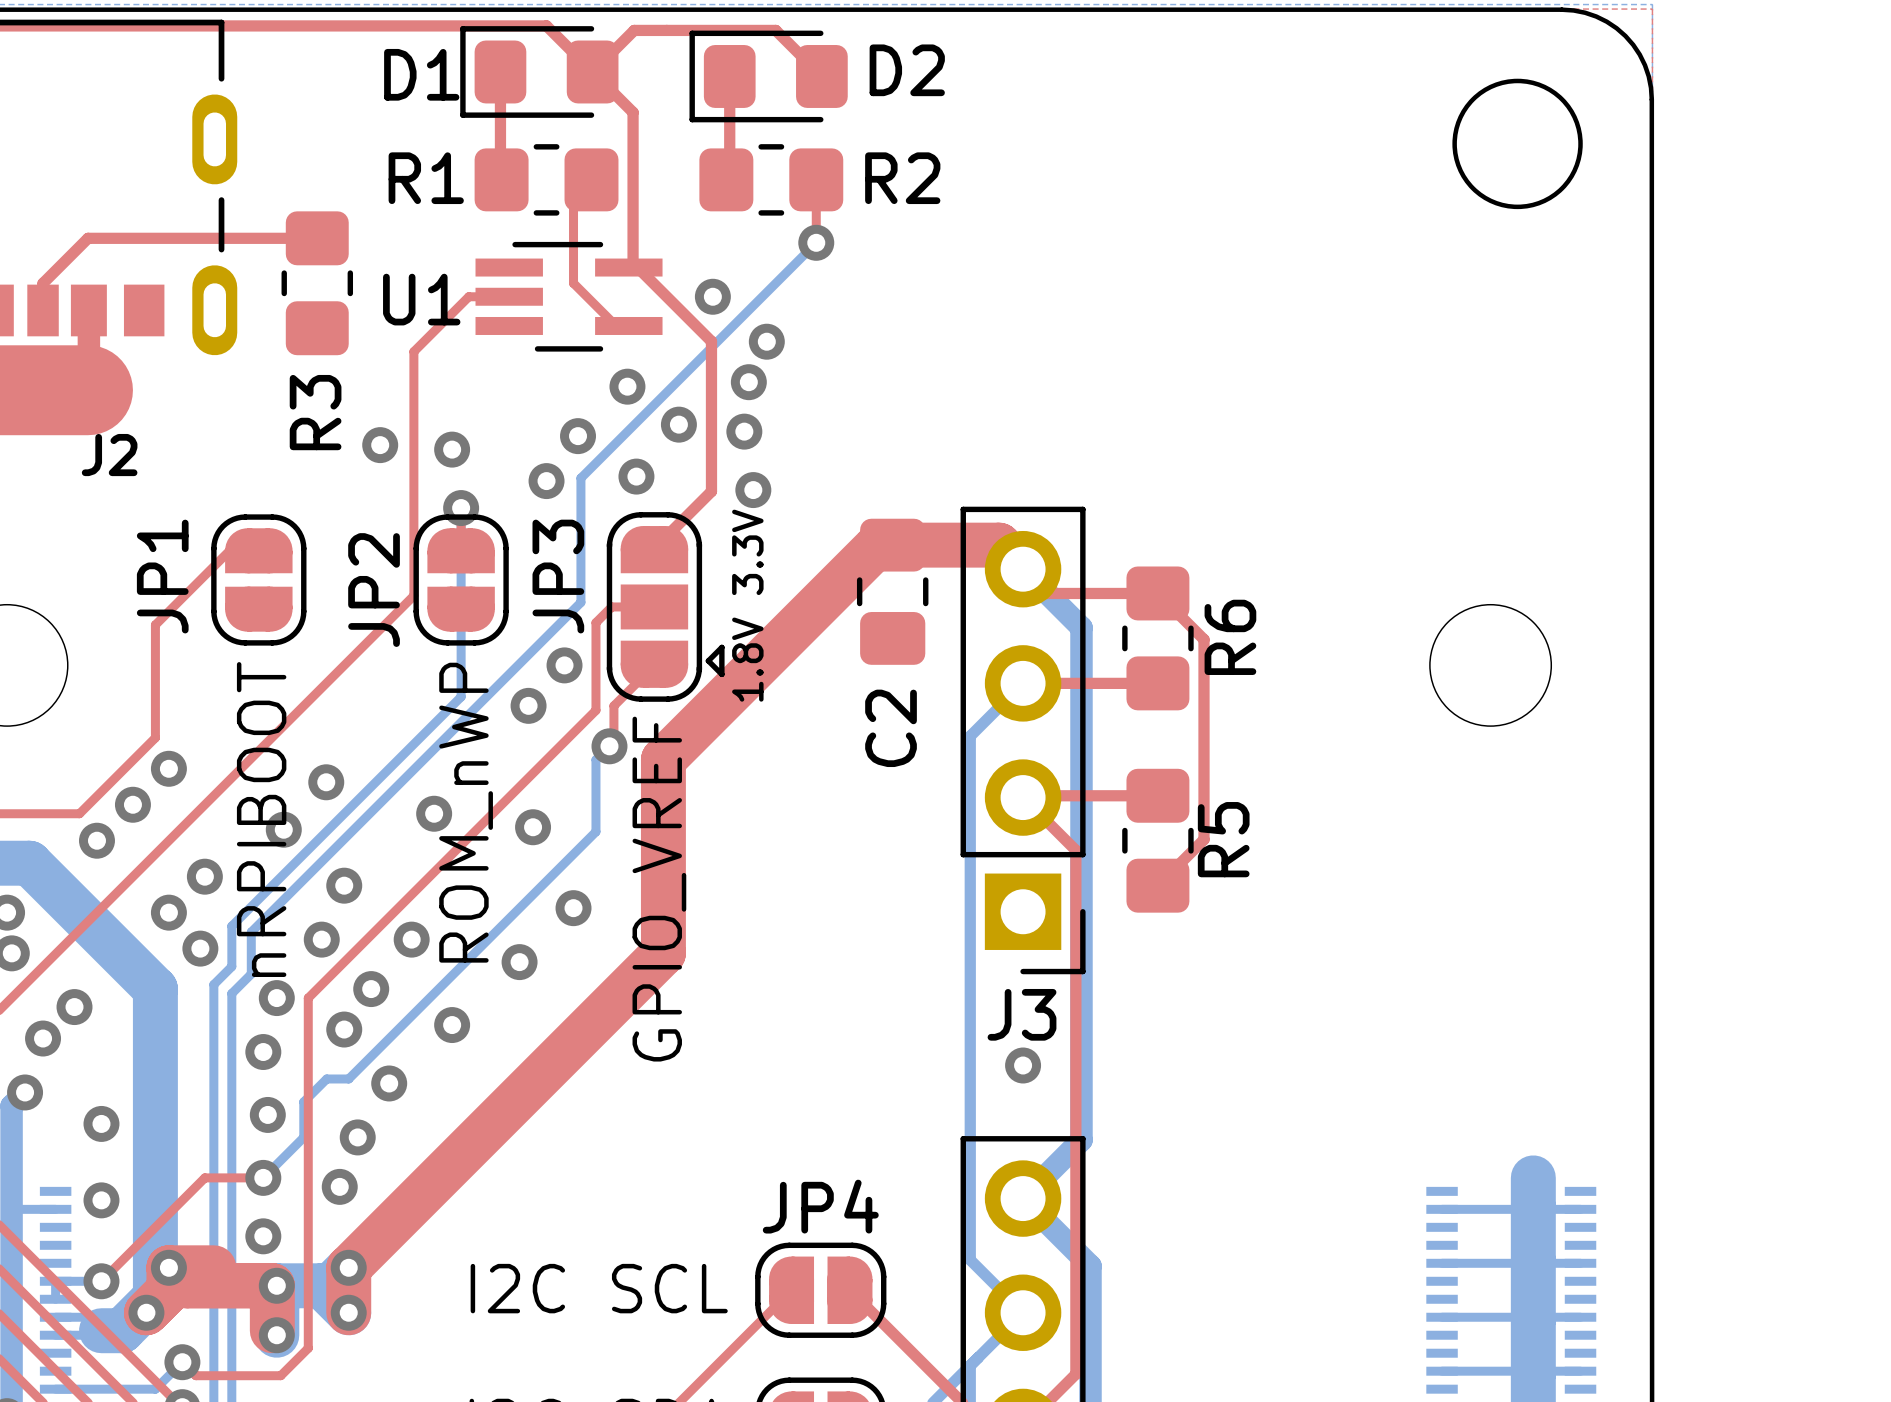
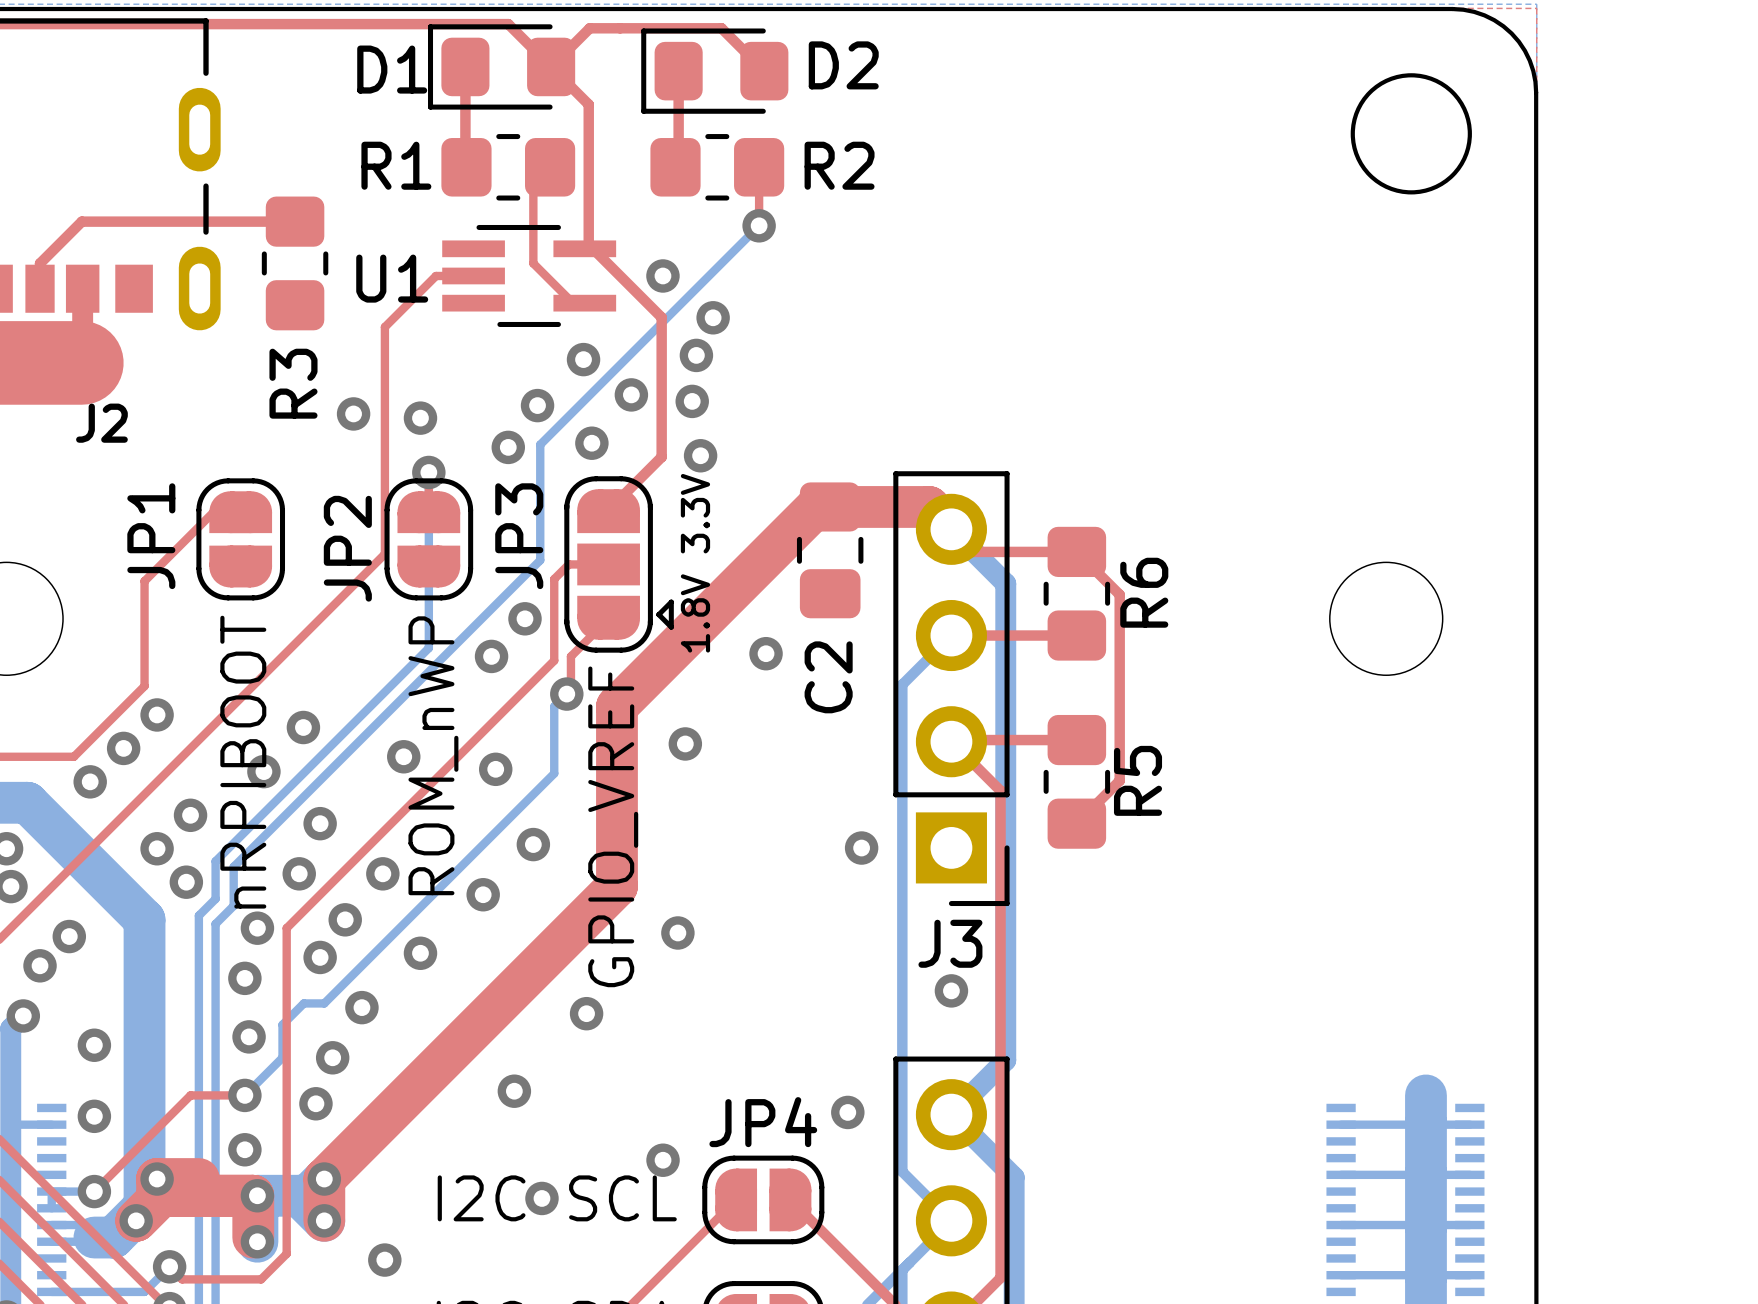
via: none -> (766, 653)
via: none -> (685, 743)
via: none -> (861, 848)
via: none -> (677, 932)
via: none -> (586, 1013)
via: none -> (514, 1091)
via: none -> (847, 1112)
via: none -> (663, 1160)
via: none -> (541, 1198)
via: none -> (384, 1260)

